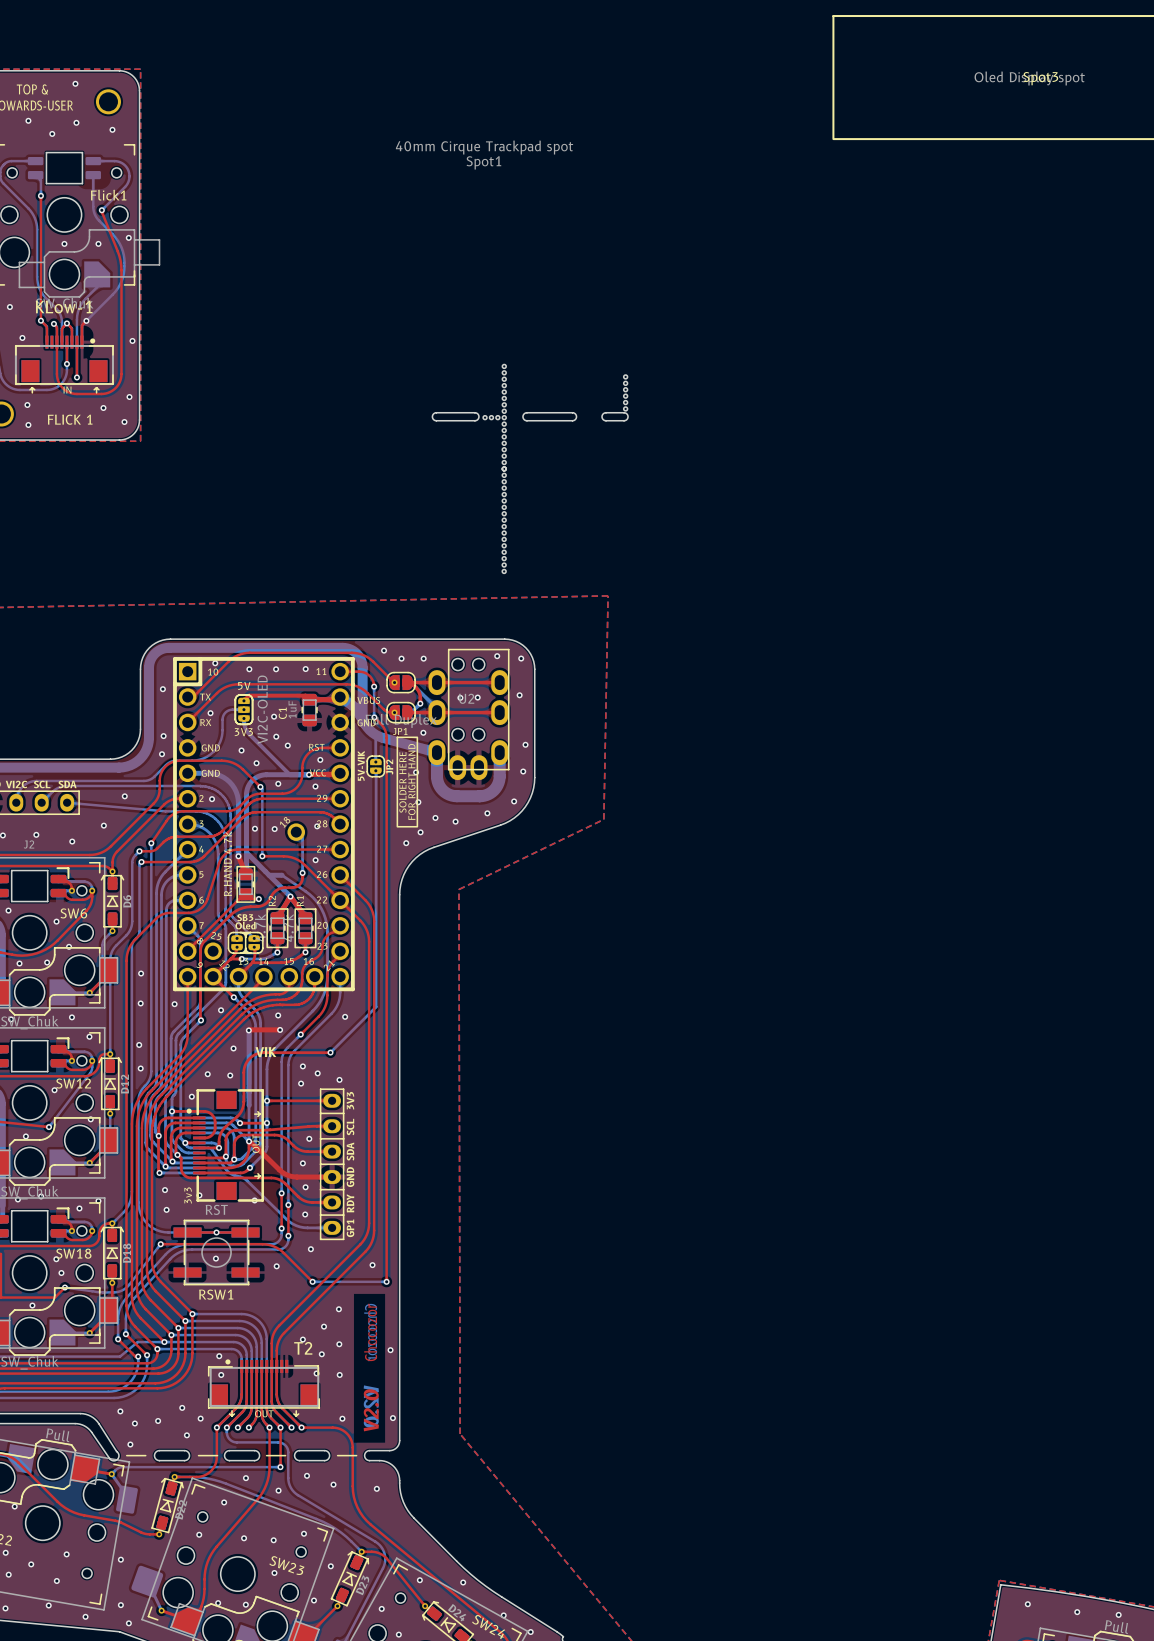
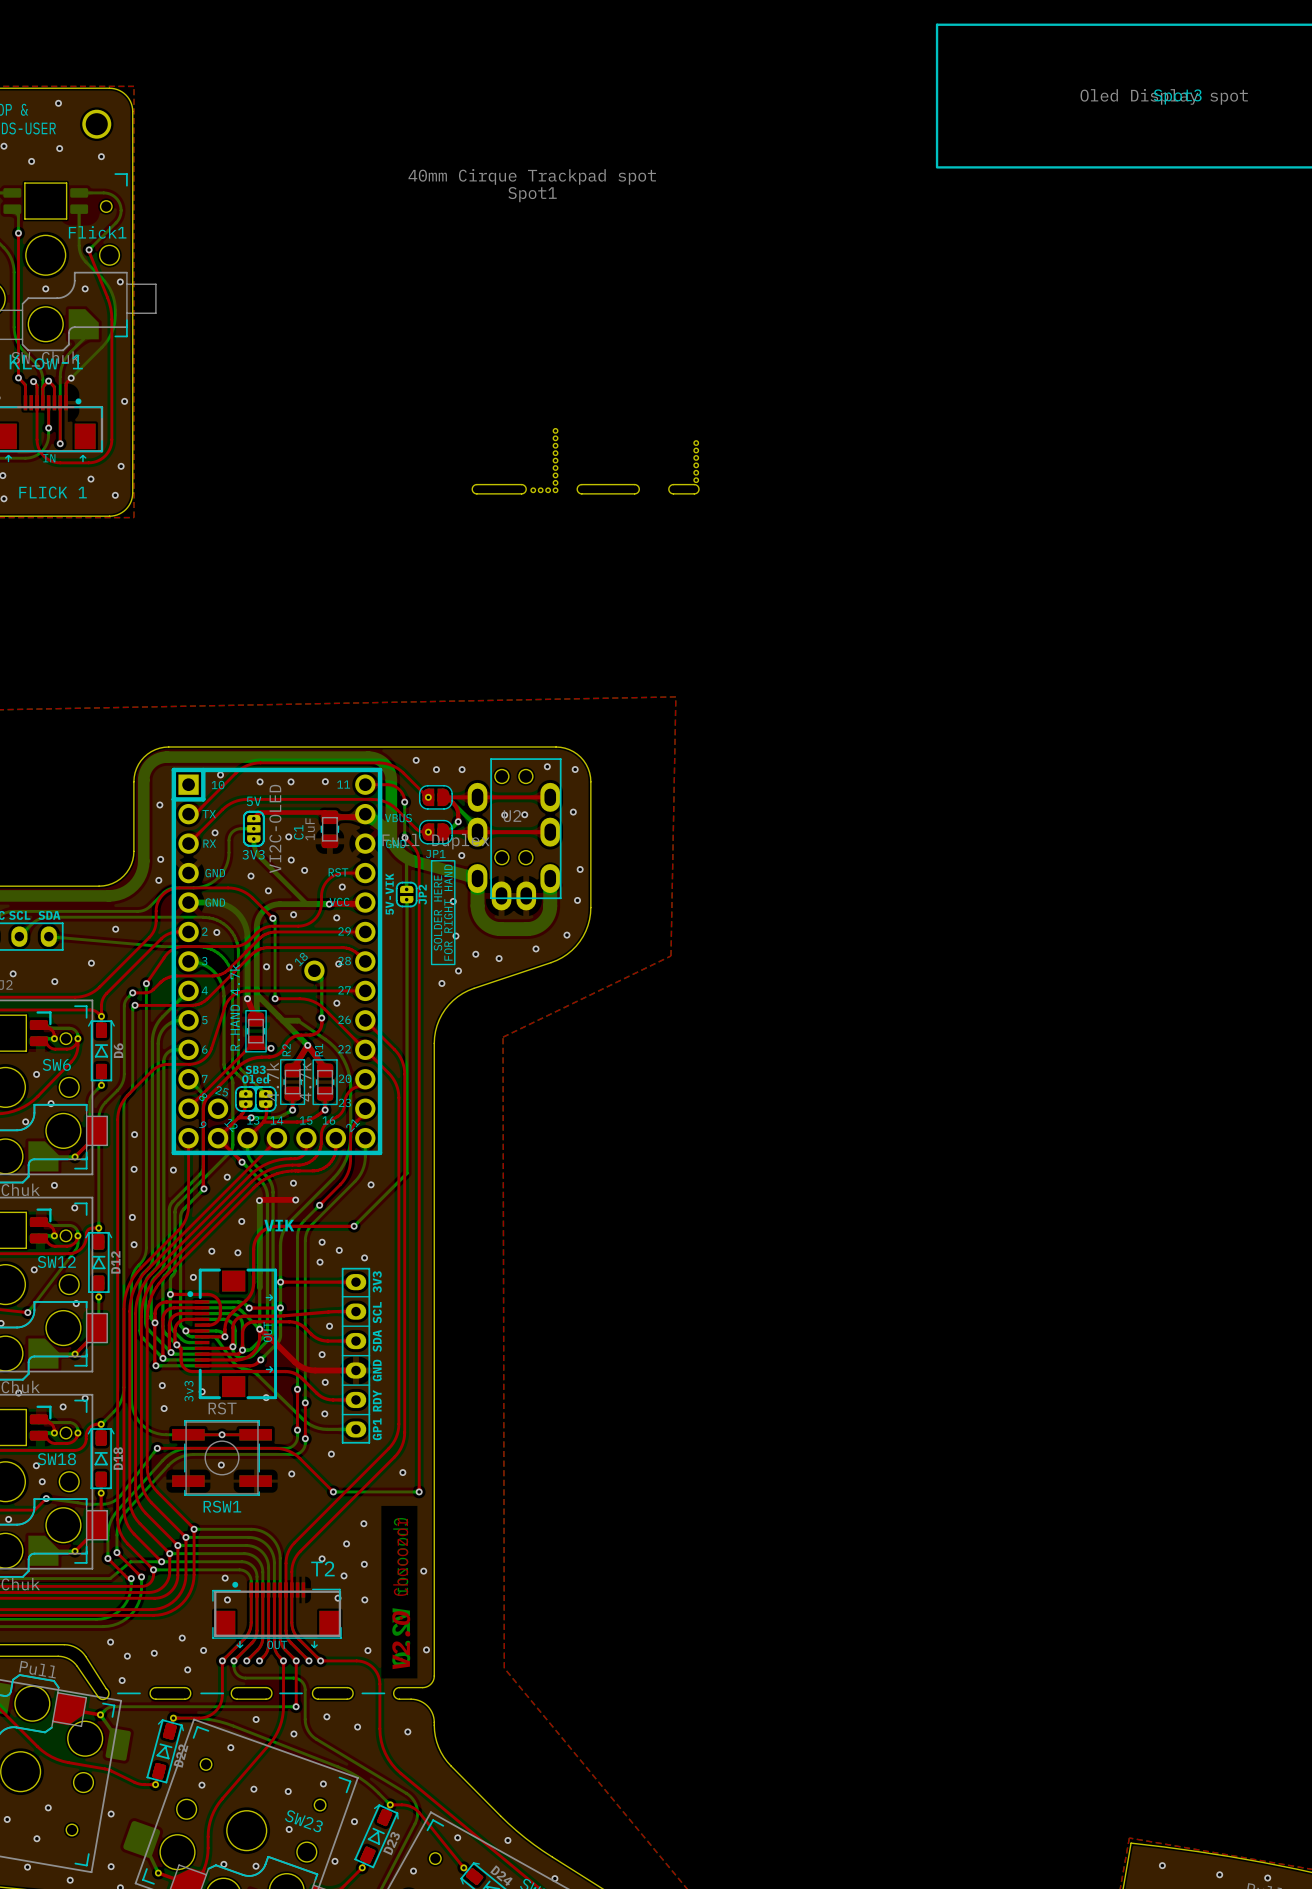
round board edge: [501, 421, 507, 427] -> none
round board edge: [501, 428, 507, 433] -> none
round board edge: [501, 434, 507, 440] -> none
round board edge: [501, 440, 507, 446] -> none
round board edge: [501, 447, 507, 453] -> none
round board edge: [501, 453, 507, 459] -> none
round board edge: [501, 460, 507, 465] -> none
round board edge: [501, 466, 507, 472] -> none
round board edge: [501, 472, 507, 478] -> none
round board edge: [501, 479, 507, 485] -> none
round board edge: [501, 485, 507, 491] -> none
round board edge: [501, 492, 507, 497] -> none
round board edge: [501, 498, 507, 504] -> none
round board edge: [501, 504, 507, 510] -> none
round board edge: [501, 511, 507, 517] -> none
round board edge: [501, 517, 507, 523] -> none
round board edge: [501, 524, 507, 530] -> none
round board edge: [501, 530, 507, 536] -> none
round board edge: [501, 537, 507, 542] -> none
round board edge: [501, 543, 507, 549] -> none
round board edge: [501, 549, 507, 555] -> none
round board edge: [501, 556, 507, 562] -> none
round board edge: [501, 562, 507, 568] -> none
round board edge: [501, 569, 507, 574] -> none

